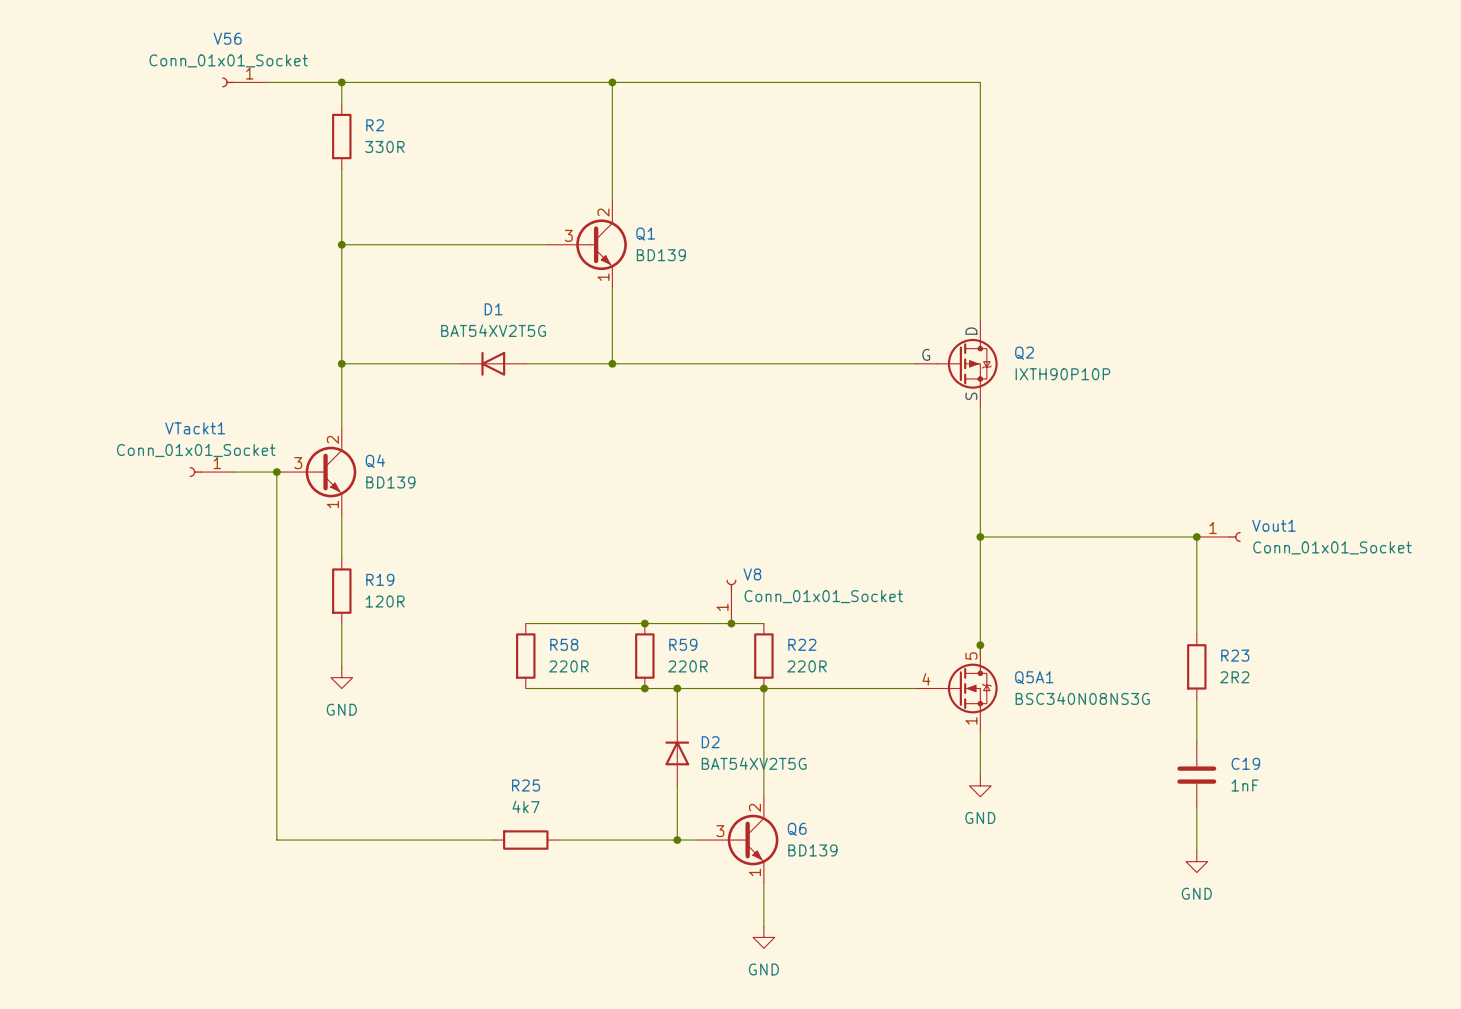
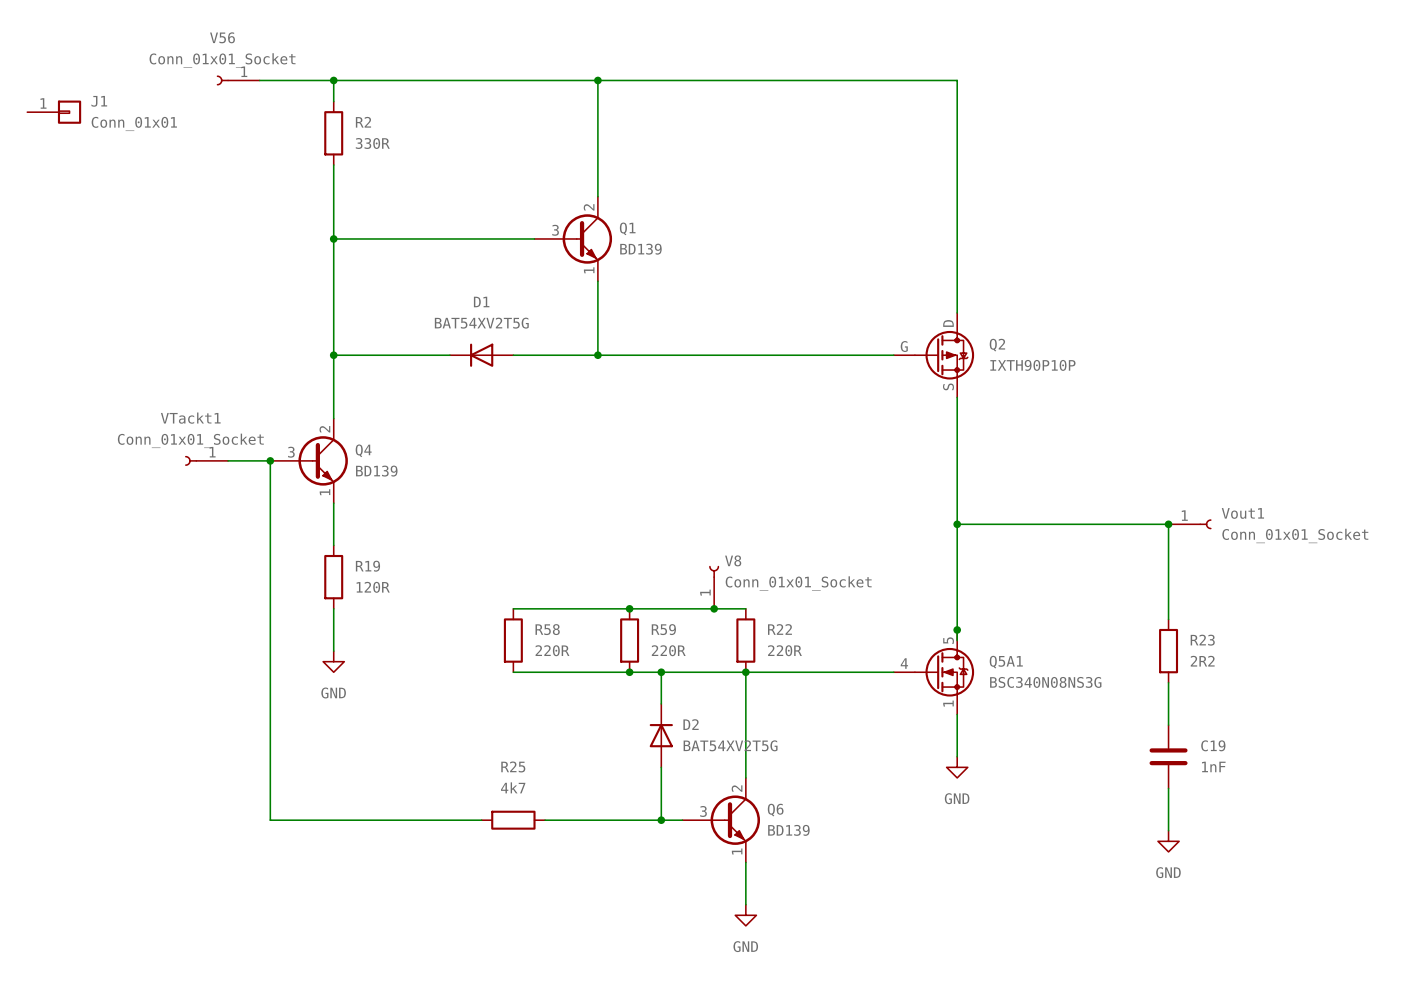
J1: none -> Conn_01x01 (54, 112)

